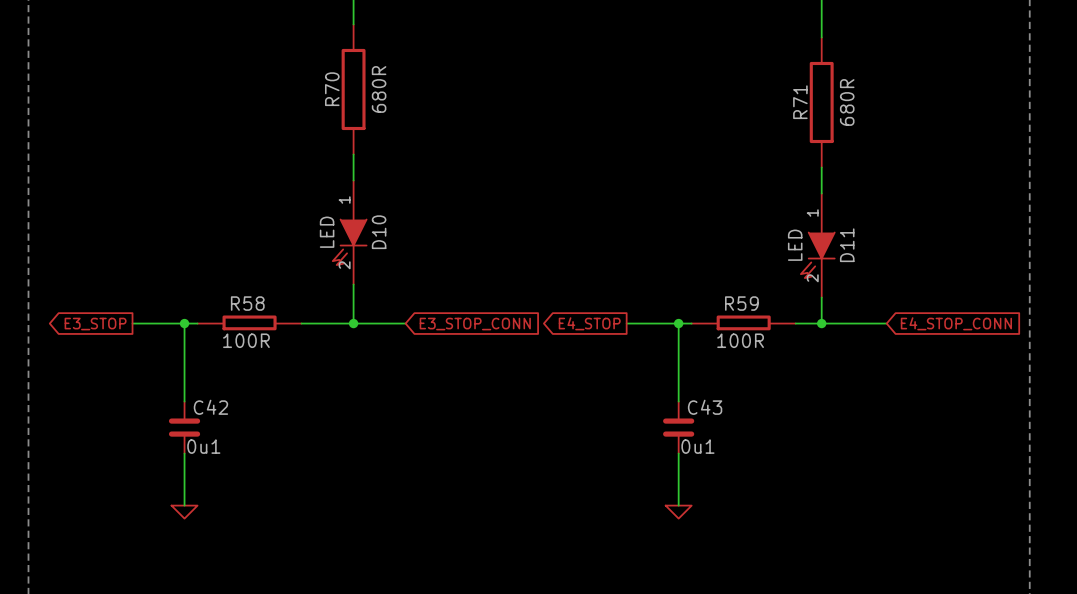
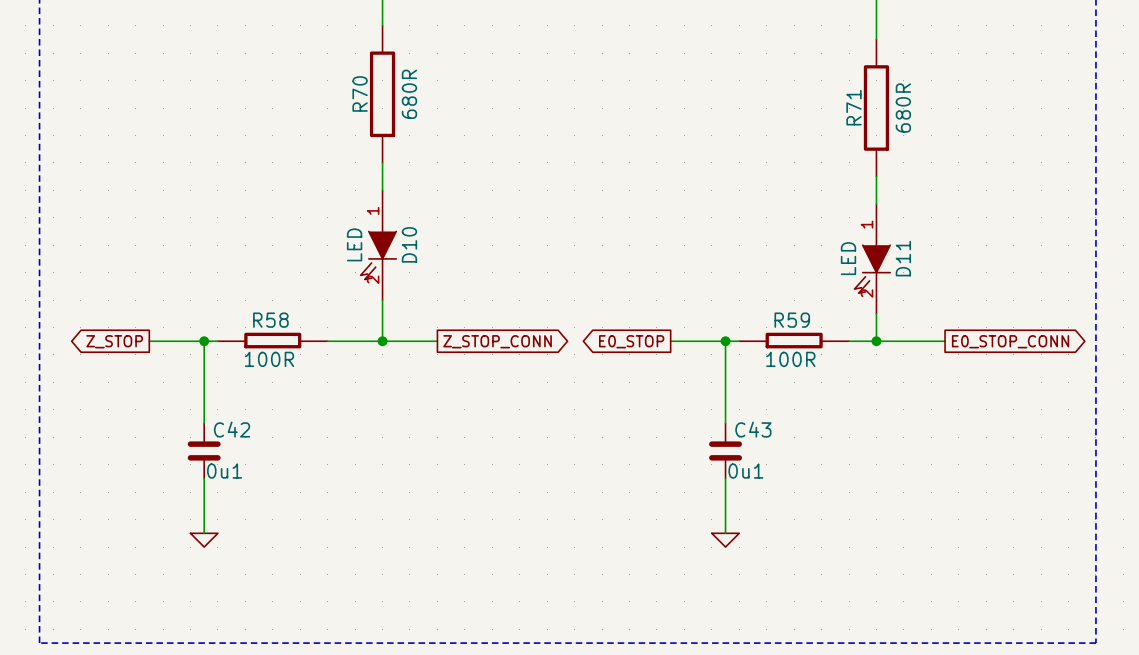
global label: E4_STOP (589, 323) -> E0_STOP (631, 341)
global label shape: input (956, 323) -> output (1010, 341)
global label: E4_STOP_CONN (956, 323) -> E0_STOP_CONN (1010, 341)
global label: E3_STOP (95, 324) -> Z_STOP (114, 341)
global label shape: input (475, 324) -> output (497, 341)
global label: E3_STOP_CONN (475, 324) -> Z_STOP_CONN (497, 341)

